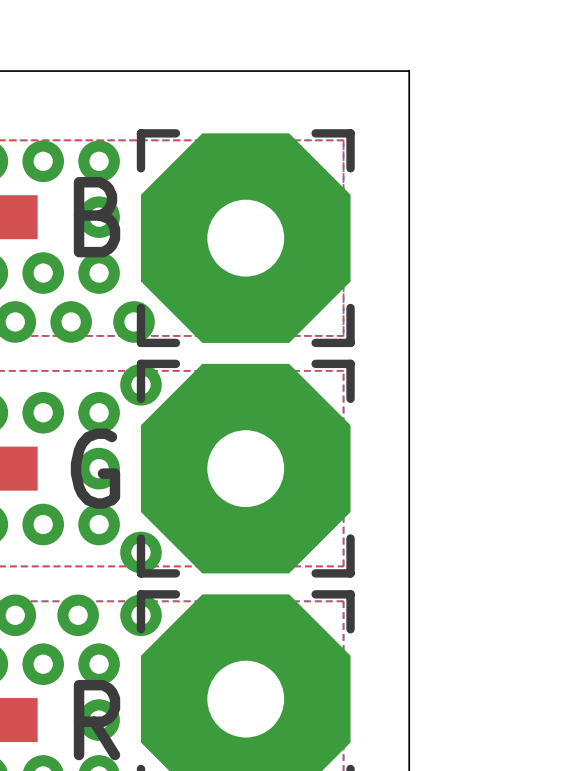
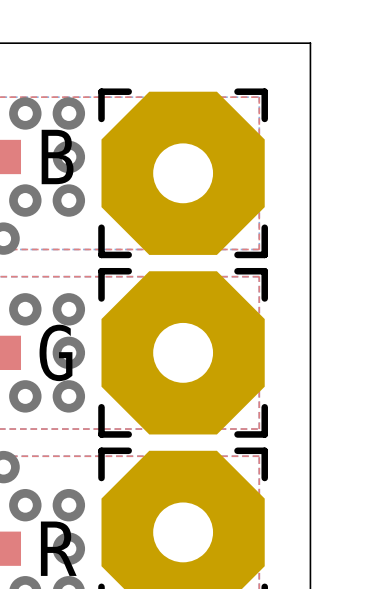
via: (71, 321) -> none
via: (134, 321) -> none
via: (141, 384) -> none
via: (141, 552) -> none
via: (78, 615) -> none
via: (141, 615) -> none

